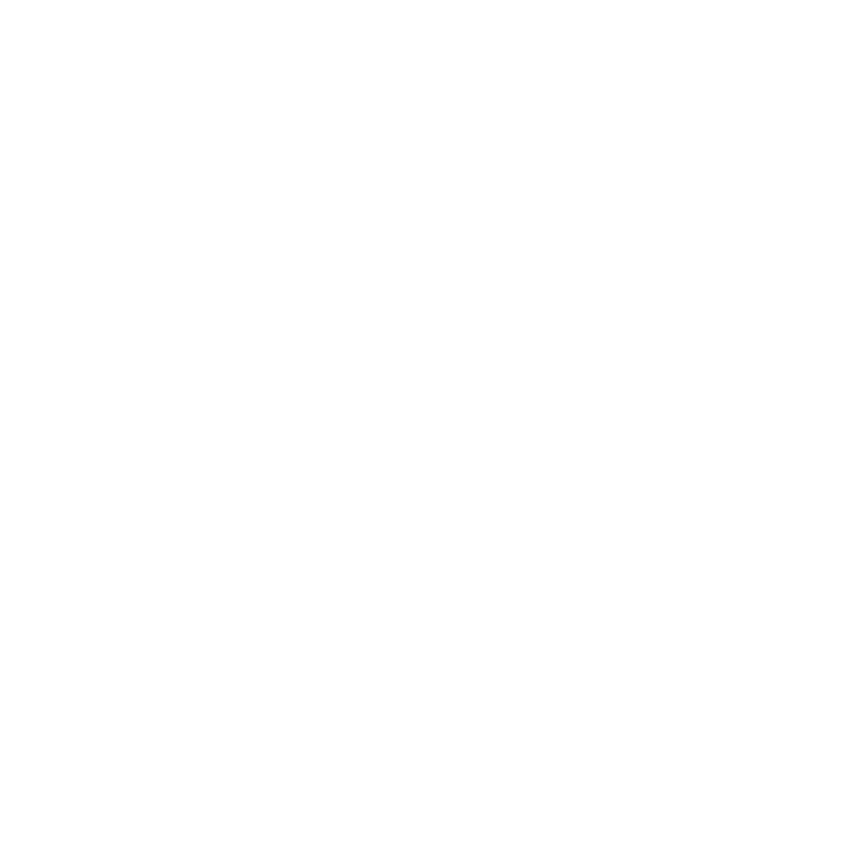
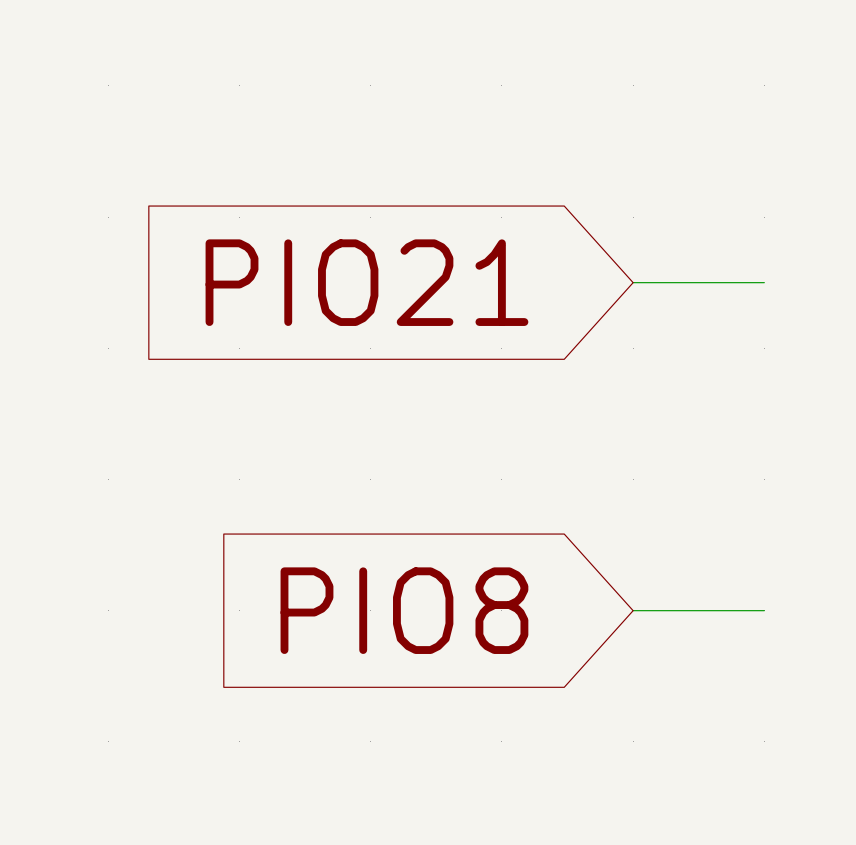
global label: none -> PIO21 (366, 282)
wire: none -> (633, 282) (764, 282)
global label: none -> PIO8 (404, 610)
wire: none -> (633, 610) (764, 610)

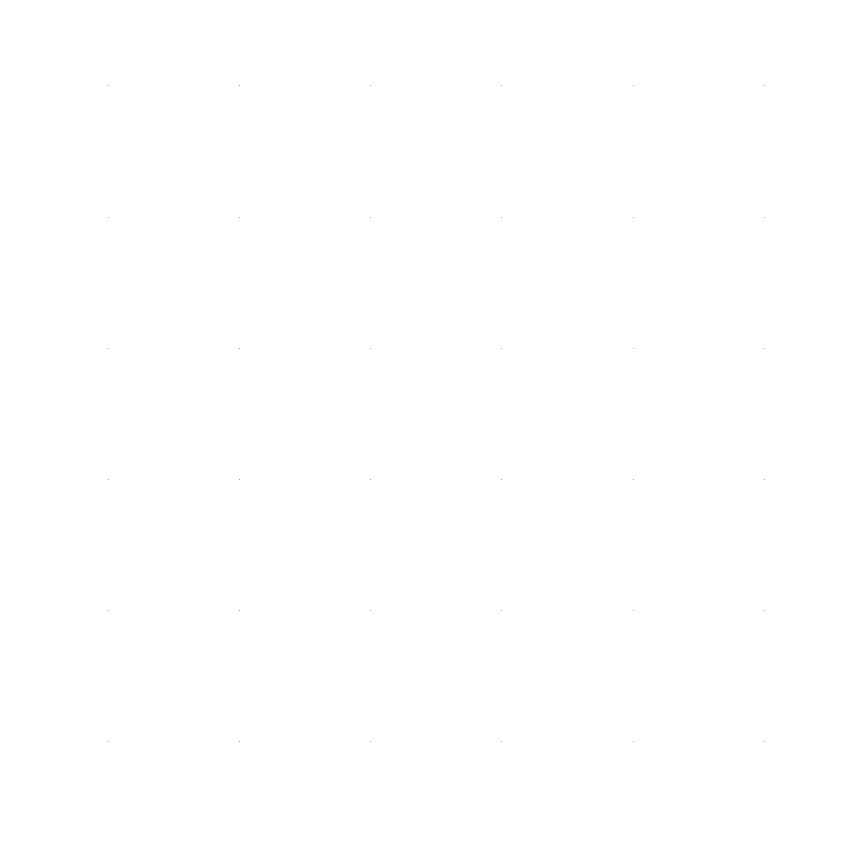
global label: PIO21 (366, 282) -> none
wire: (633, 282) (764, 282) -> none
global label: PIO8 (404, 610) -> none
wire: (633, 610) (764, 610) -> none

